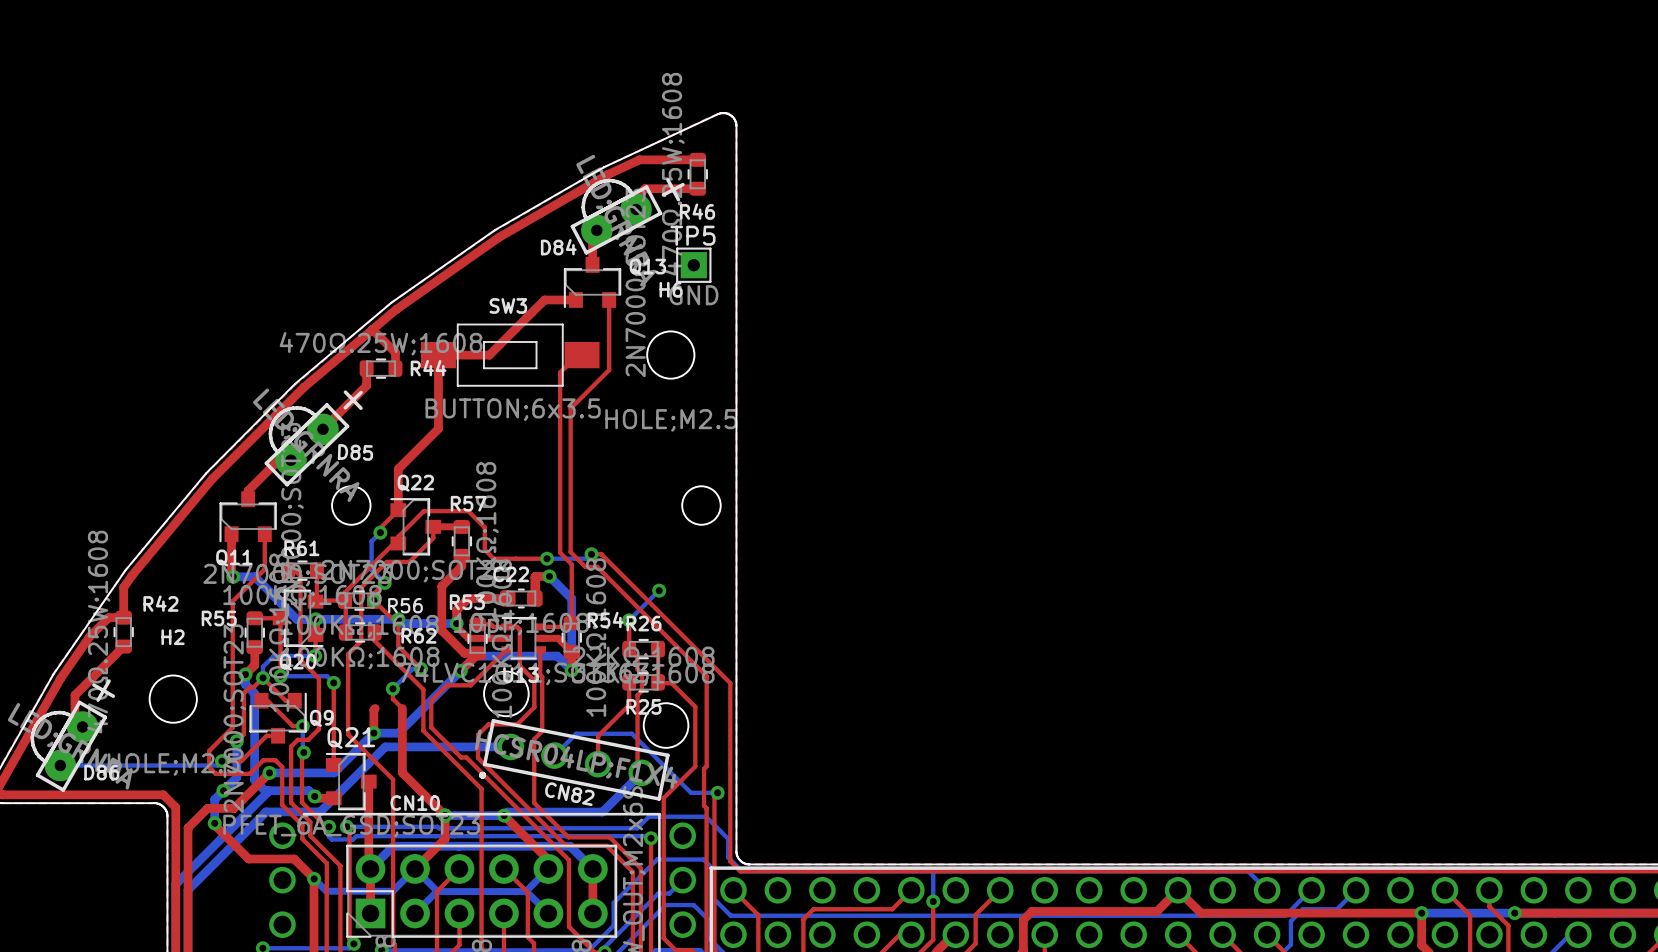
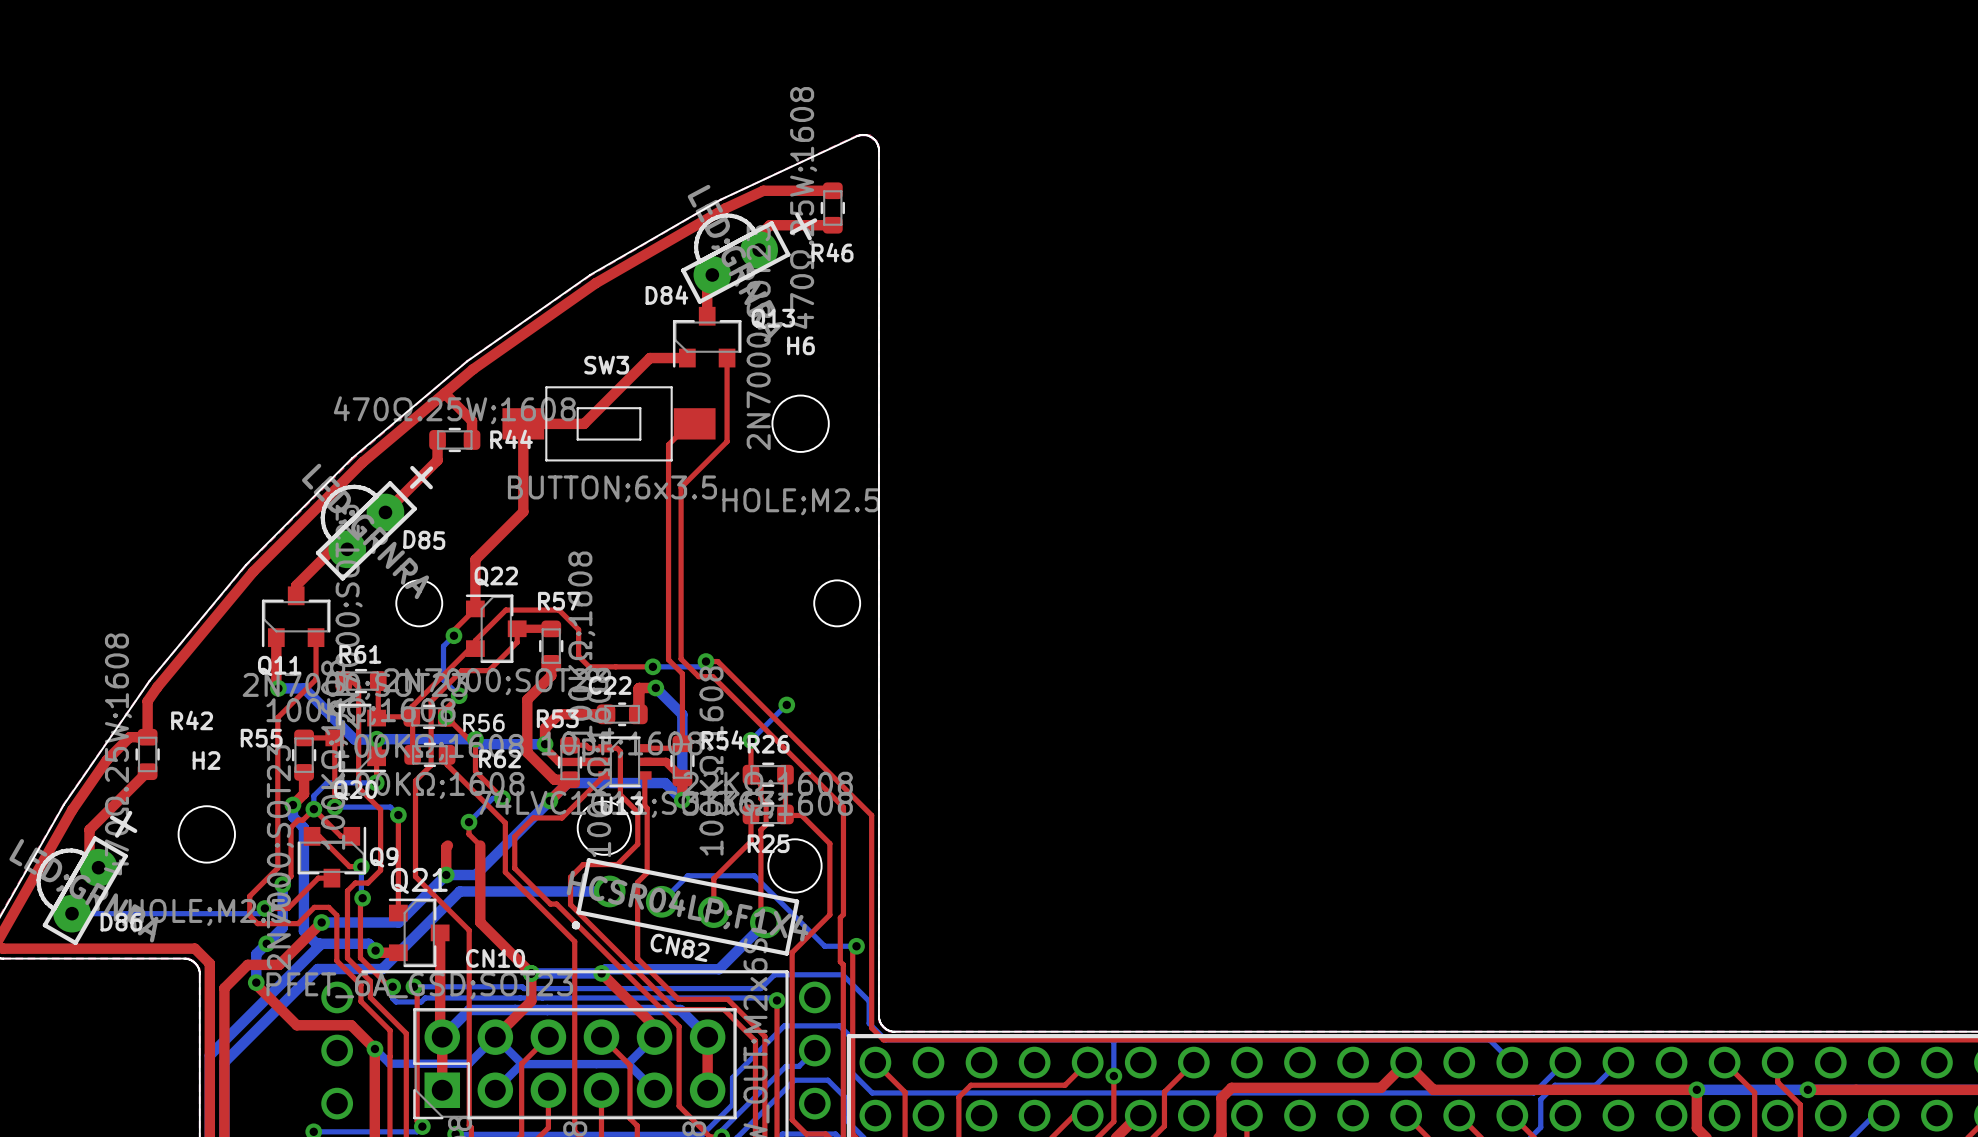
TP5: GND (693, 265) -> none

